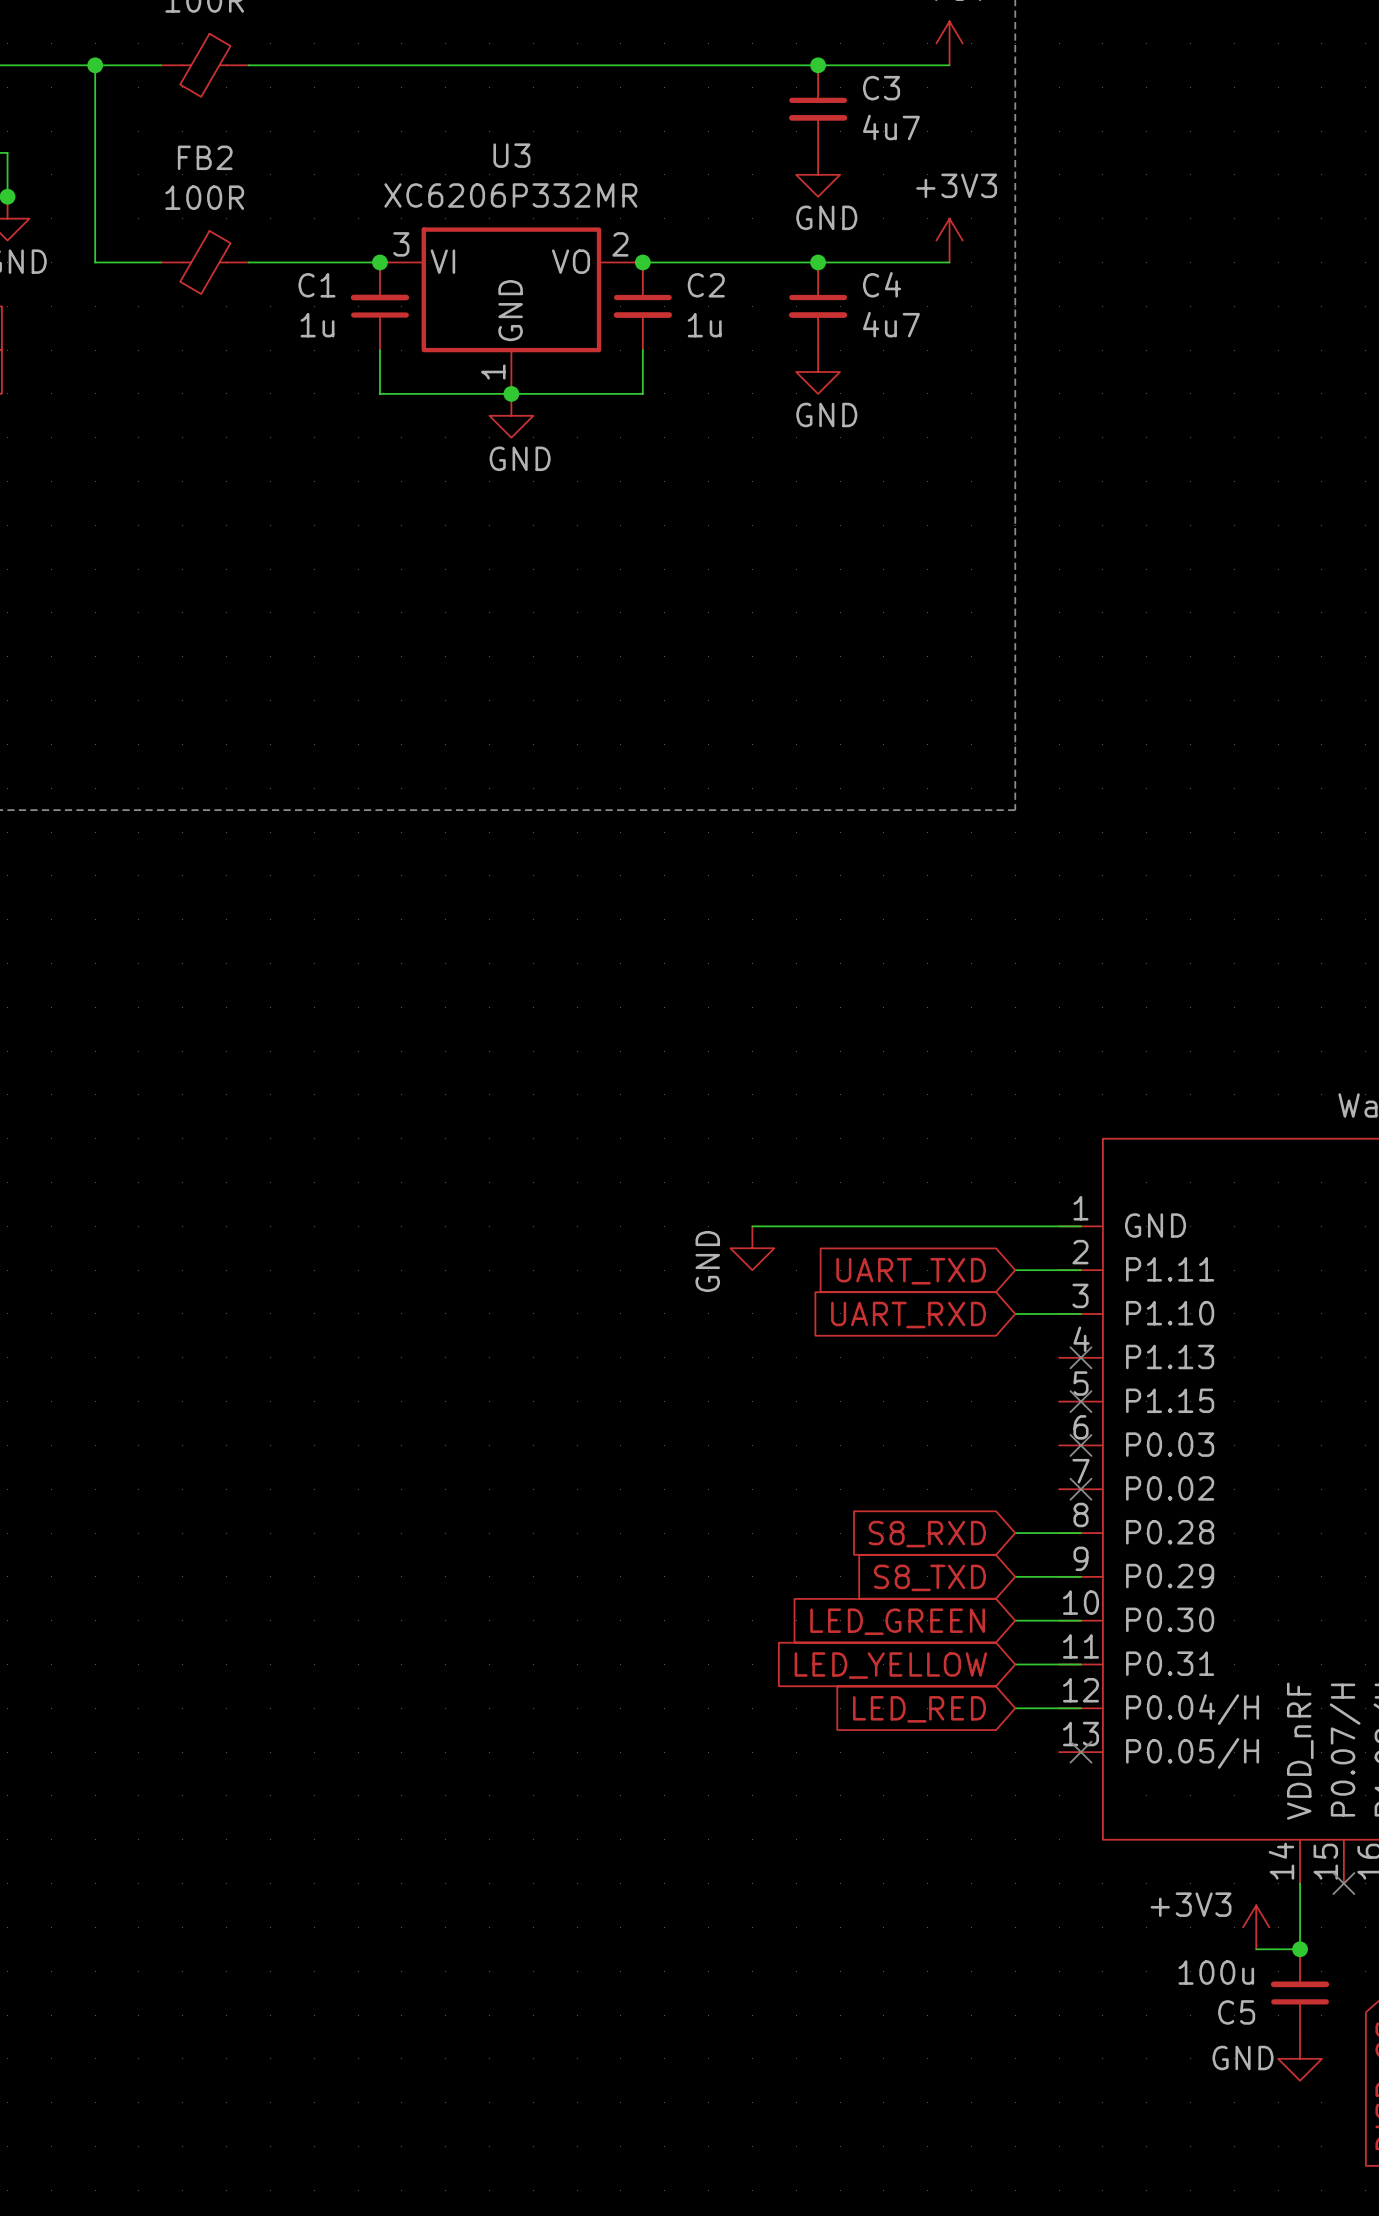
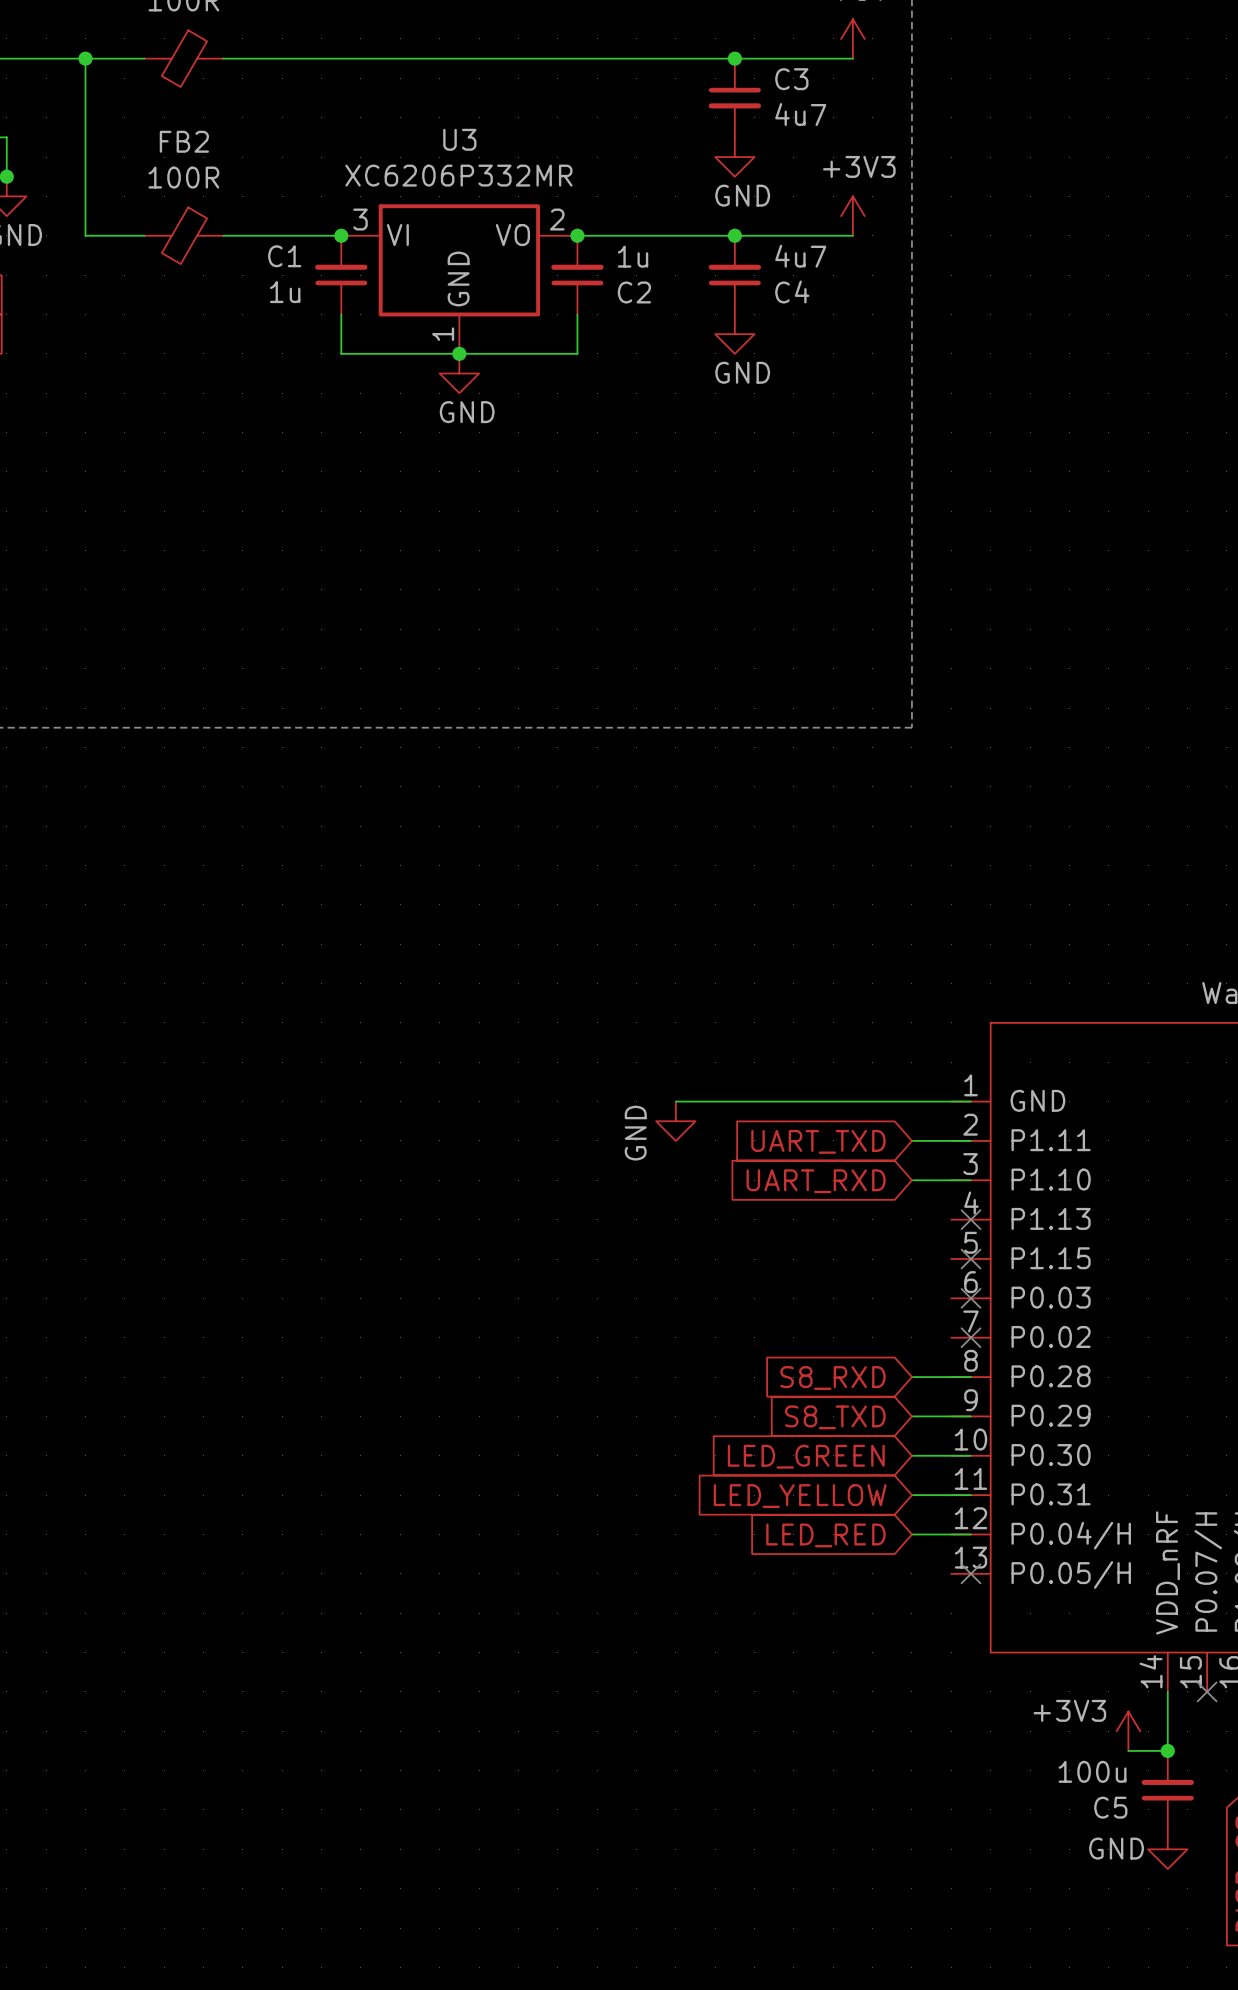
C4 name position: C4 (882, 284) -> C4 (792, 292)
C2 name position: C2 (706, 285) -> C2 (634, 292)
C2 rotation: 0° (642, 306) -> 180° (577, 275)
C4 rotation: 0° (818, 306) -> 180° (734, 275)
C4 value position: 4u7 (891, 324) -> 4u7 (800, 256)
C2 value position: 1u (704, 325) -> 1u (633, 256)

